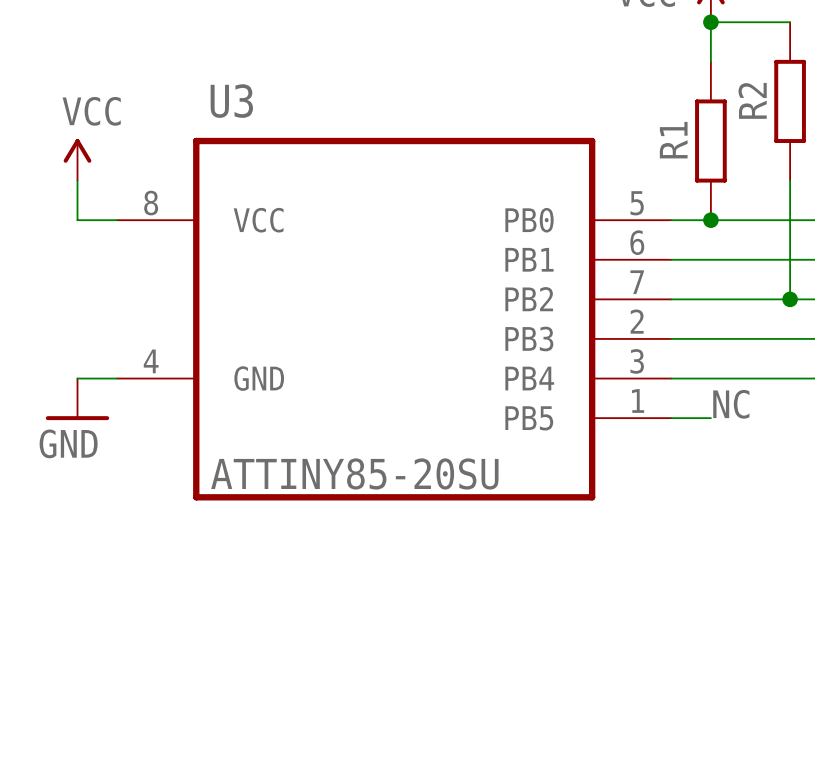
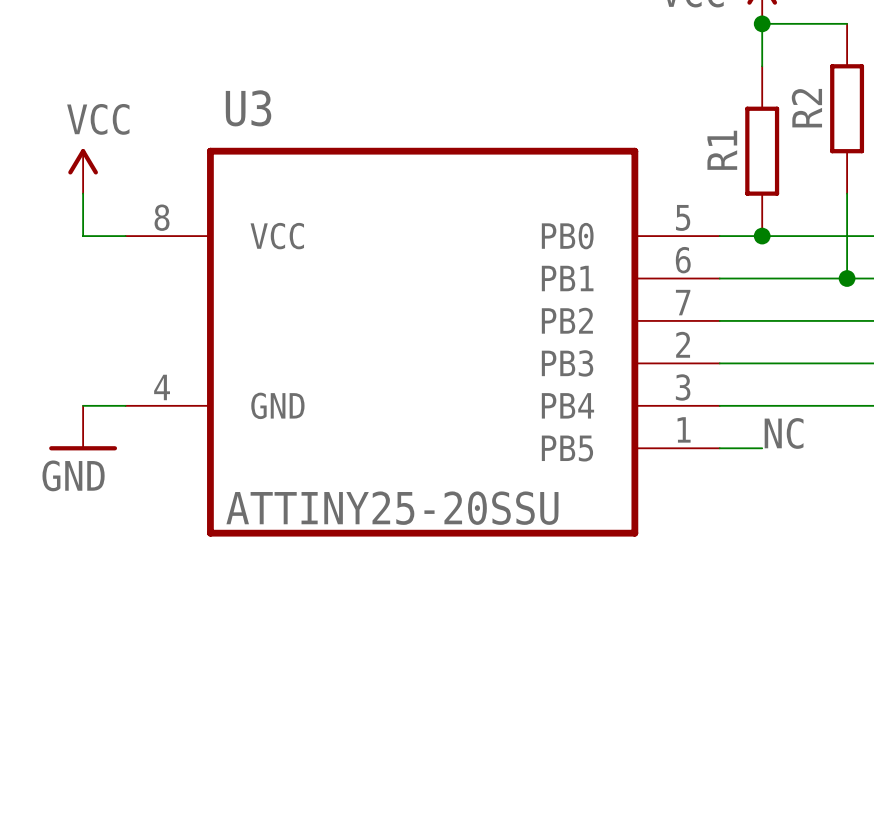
wire: (790, 259) (790, 299) -> none
junction: none -> (847, 278)
junction: (790, 299) -> none
U3 value: ATTINY85-20SU (354, 473) -> ATTINY25-20SSU (392, 508)

